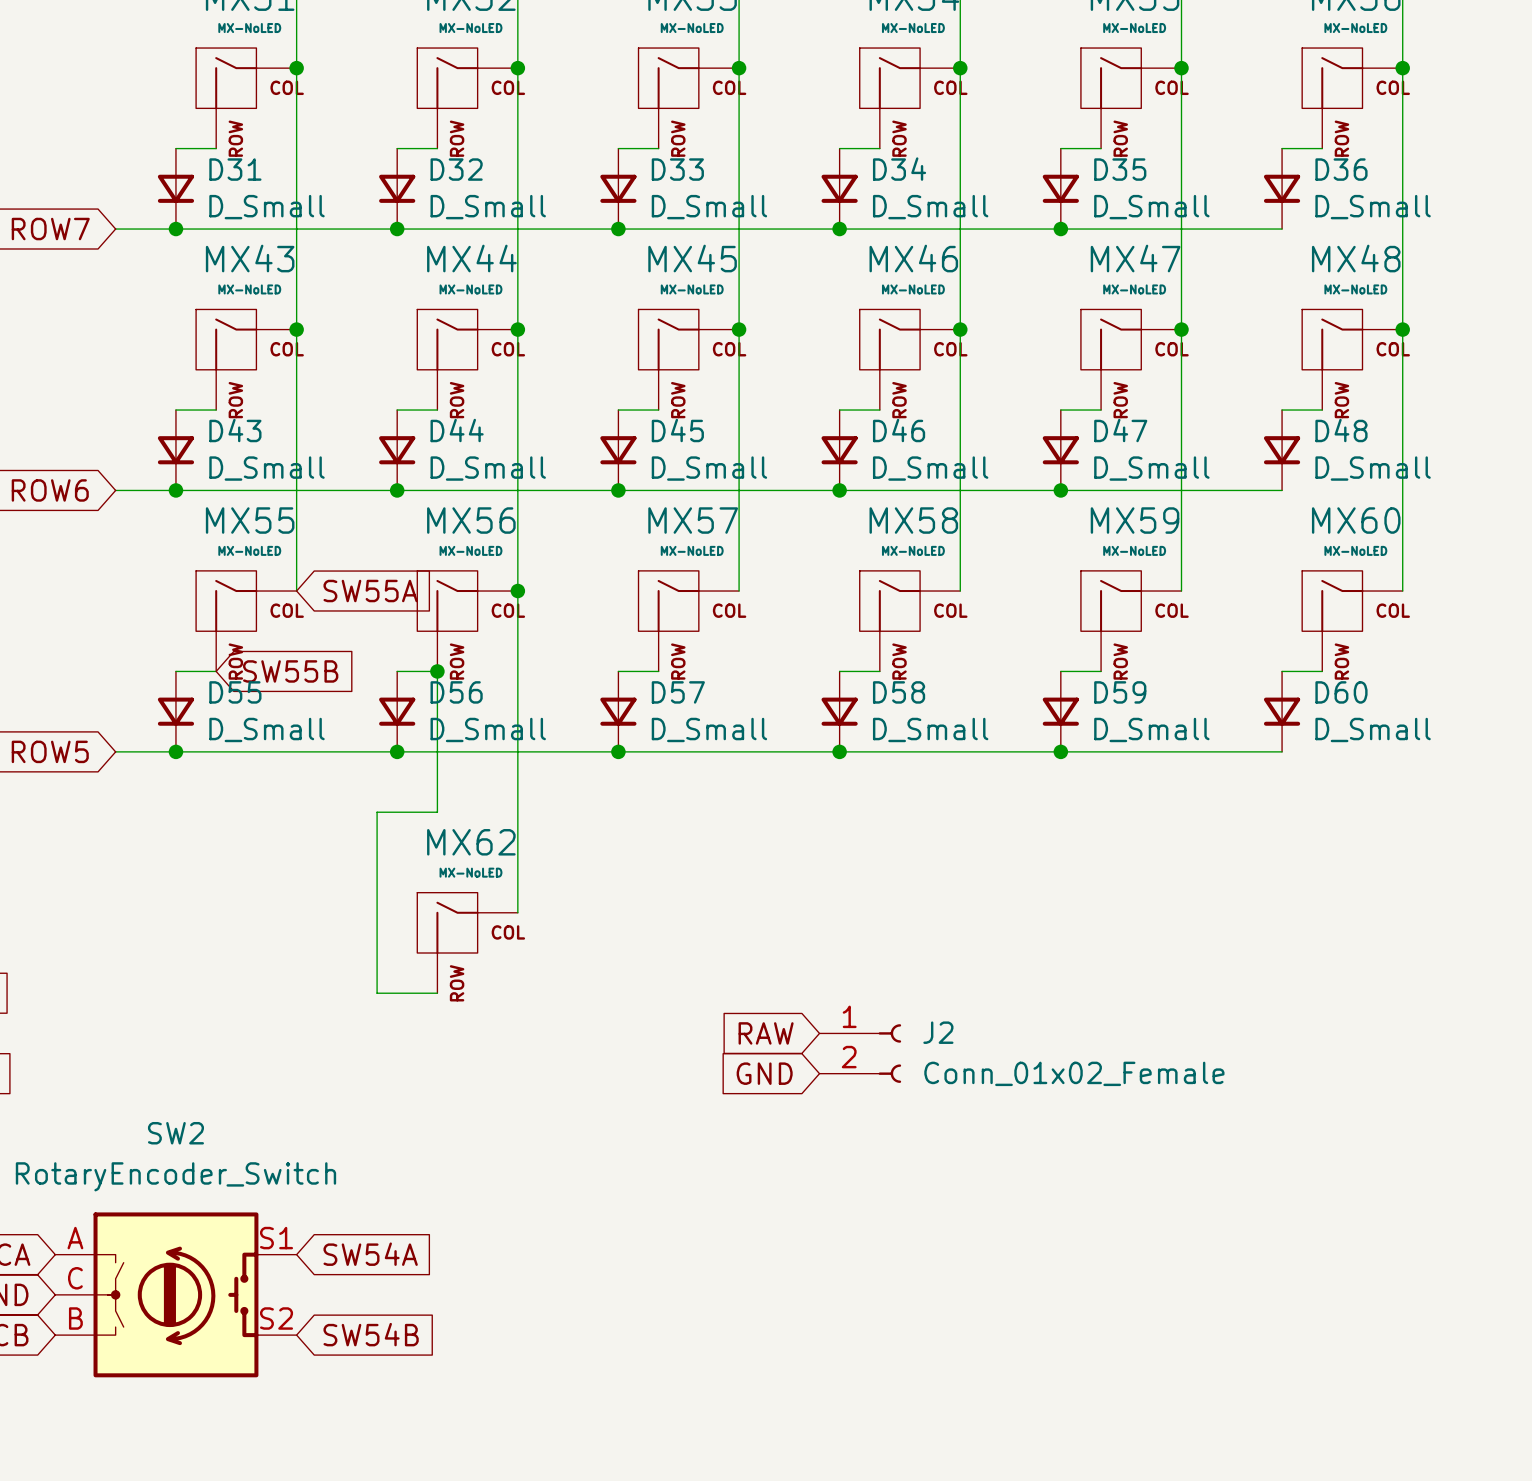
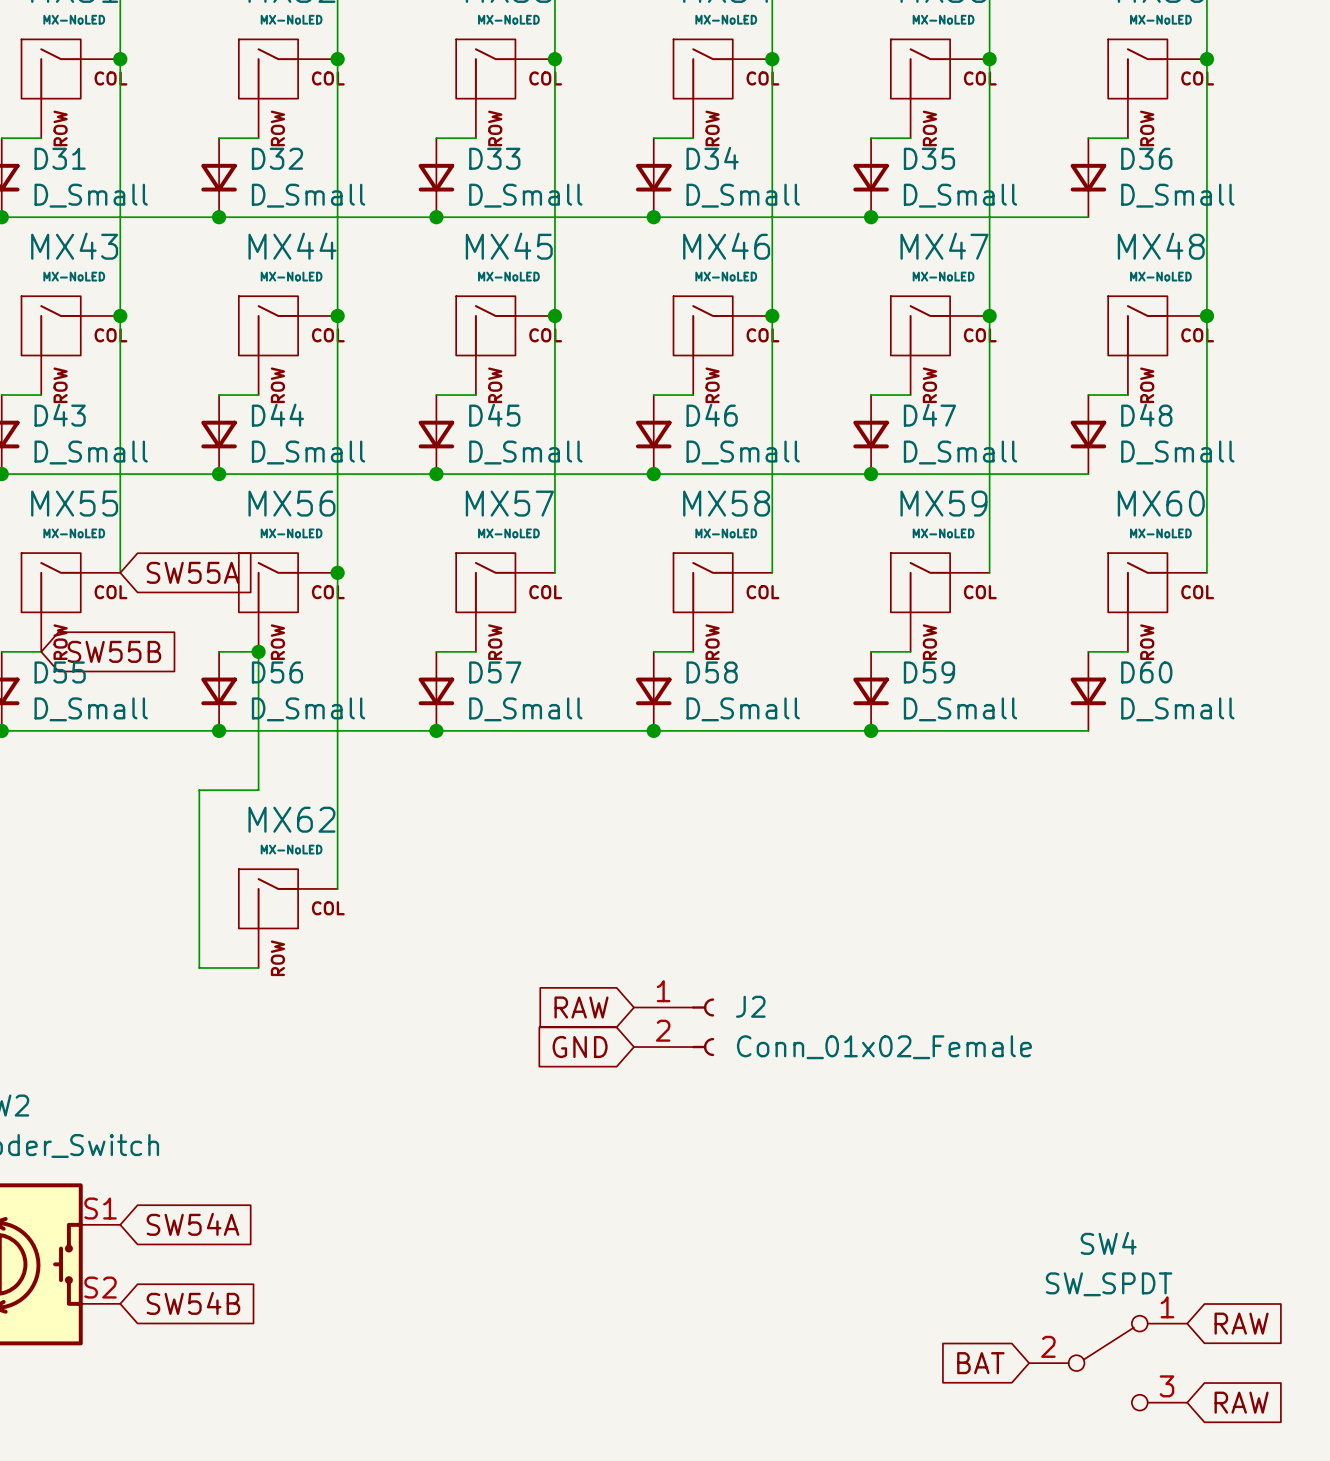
global label: none -> RAW (1241, 1323)
global label: none -> BAT (980, 1363)
SW4: none -> SW_SPDT (1108, 1363)
global label: none -> RAW (1241, 1402)

